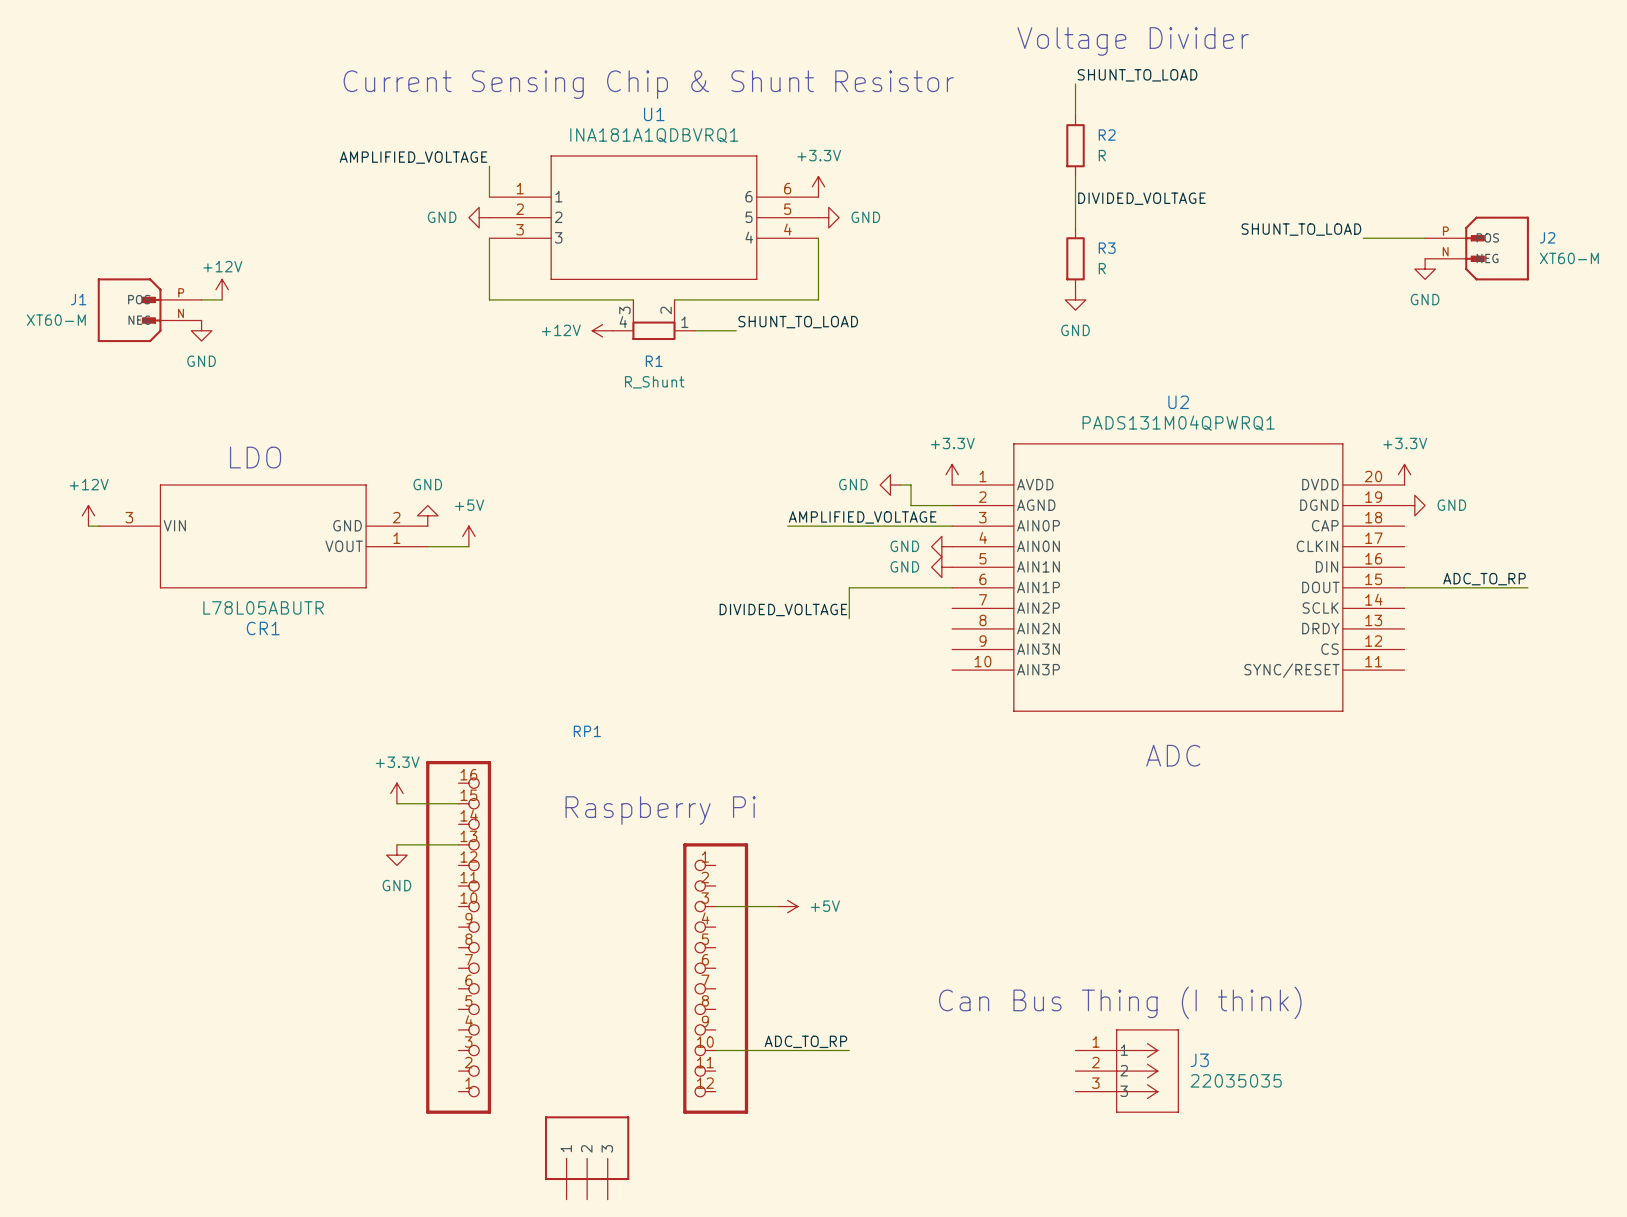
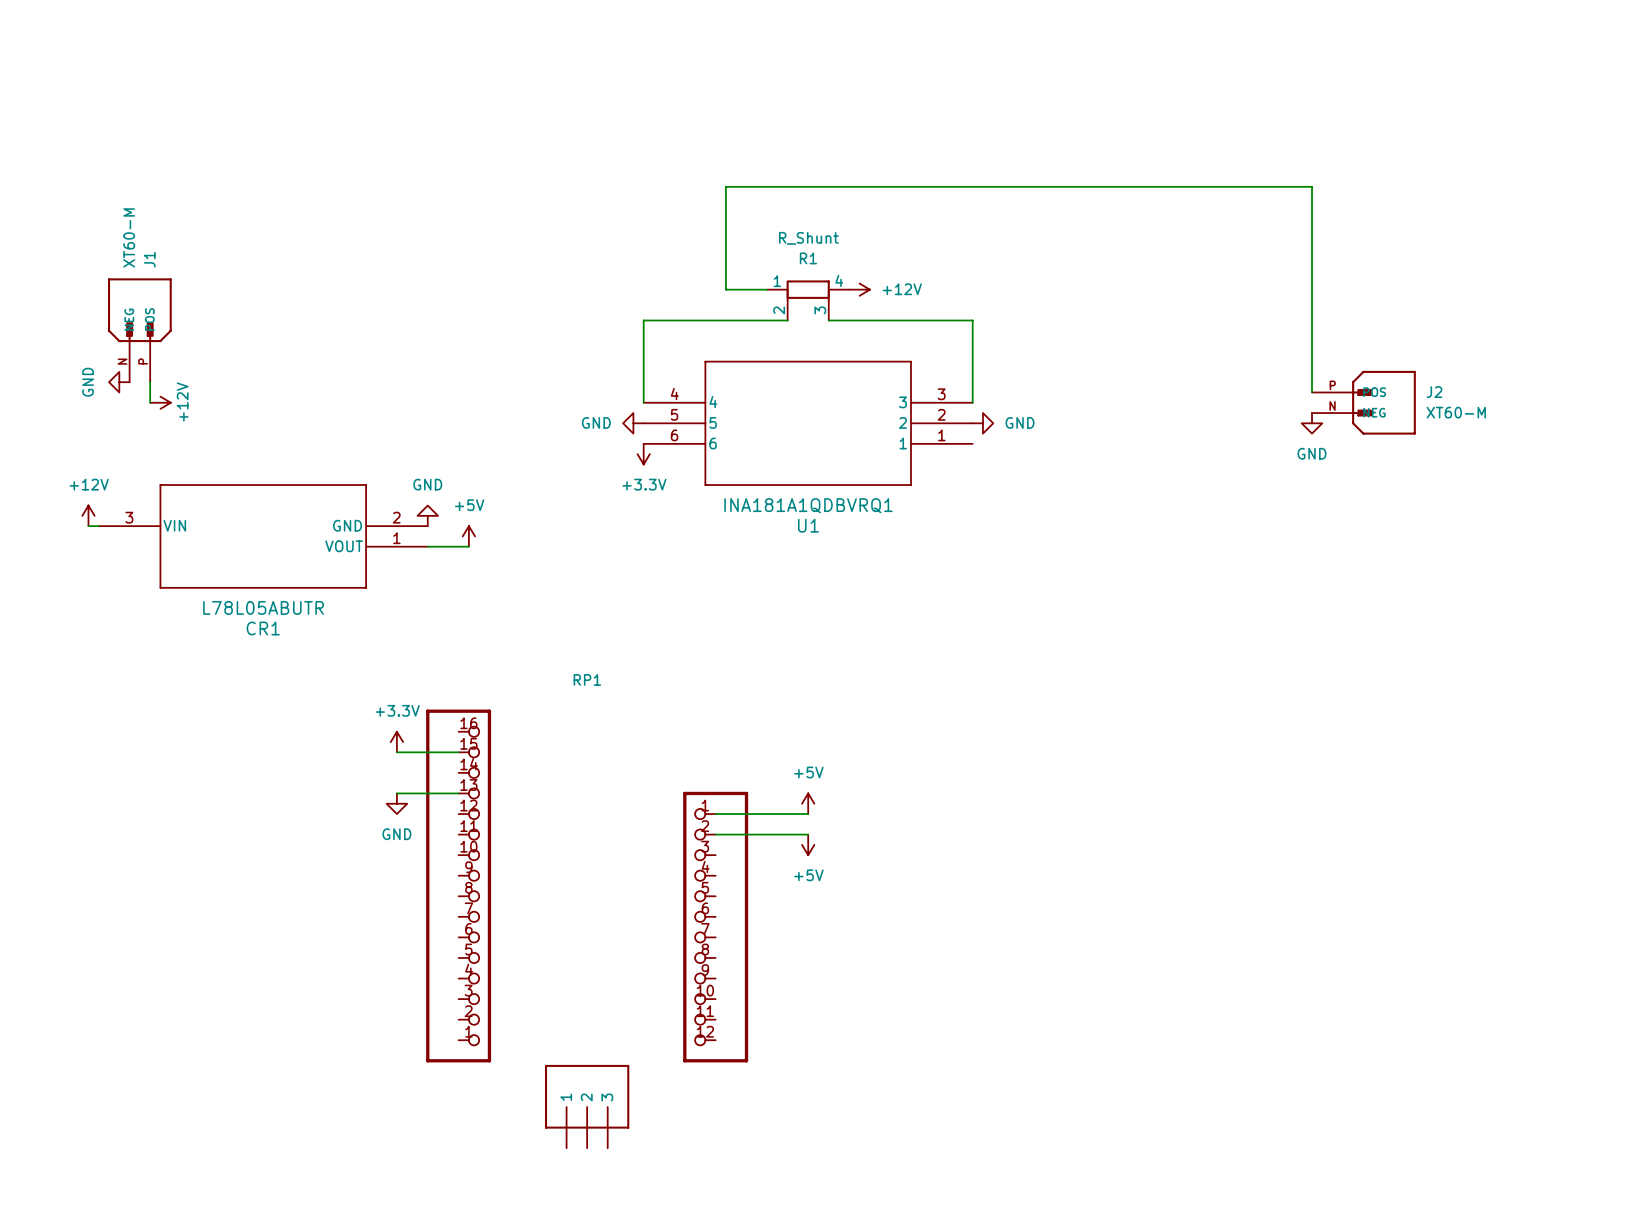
text: Voltage Divider (1133, 41) -> none
label: SHUNT_TO_LOAD (1137, 75) -> none
text: Current Sensing Chip & Shunt Resistor (648, 84) -> none
wire: (1075, 84) (1075, 114) -> none
R2: R (1075, 145) -> none
label: AMPLIFIED_VOLTAGE (413, 157) -> none
wire: (489, 166) (489, 197) -> none
wire: (1075, 176) (1075, 227) -> none
power symbol: +3.3V (818, 186) -> none
label: DIVIDED_VOLTAGE (1141, 198) -> none
power symbol: GND (479, 217) -> none
U1 rotation: 0° (653, 217) -> 180° (808, 423)
U1 position: (653, 217) -> (808, 423)
power symbol: GND (828, 217) -> none
label: SHUNT_TO_LOAD (1301, 229) -> none
wire: (489, 238) (489, 299) (633, 299) -> none
wire: (818, 238) (818, 299) (674, 299) -> none
wire: (1363, 238) (1425, 238) -> none
J2 position: (1477, 248) -> (1363, 402)
R3: R (1075, 258) -> none
power symbol: GND (1425, 269) -> none
power symbol rotation: 0° (222, 289) -> 90° clockwise (160, 402)
power symbol position: +12V (222, 289) -> +12V (160, 402)
wire: none -> (767, 289) (725, 289) (725, 186) (1312, 186) (1312, 392)
power symbol: none -> +12V (859, 289)
wire: (201, 299) (222, 299) -> none
power symbol: GND (1075, 299) -> none
J1 rotation: 0° (129, 310) -> 90° clockwise (139, 310)
R1 position: (653, 319) -> (808, 300)
wire: none -> (787, 320) (643, 320) (643, 402)
wire: none -> (828, 320) (972, 320) (972, 402)
label: SHUNT_TO_LOAD (798, 322) -> none
power symbol rotation: 0° (201, 330) -> 90° clockwise (119, 382)
power symbol position: GND (201, 330) -> GND (119, 382)
power symbol: +12V (602, 330) -> none
R1 rotation: 0° (653, 330) -> 180° (808, 290)
wire: (695, 330) (736, 330) -> none
wire: none -> (150, 382) (150, 402)
power symbol: none -> GND (633, 423)
power symbol: none -> GND (982, 423)
power symbol: none -> GND (1312, 423)
power symbol: none -> +3.3V (643, 454)
text: LDO (255, 457) -> none
power symbol: +3.3V (952, 474) -> none
power symbol: +3.3V (1404, 474) -> none
power symbol: GND (890, 485) -> none
wire: (900, 485) (911, 485) (911, 505) (952, 505) -> none
power symbol: GND (1414, 505) -> none
label: AMPLIFIED_VOLTAGE (862, 517) -> none
wire: (787, 526) (952, 526) -> none
power symbol: GND (941, 546) -> none
power symbol: GND (941, 567) -> none
U2: PADS131M04QPWRQ1 (1178, 577) -> none
label: ADC_TO_RP (1484, 579) -> none
wire: (952, 587) (849, 587) (849, 618) -> none
wire: (1404, 587) (1527, 587) -> none
label: DIVIDED_VOLTAGE (783, 609) -> none
text: ADC (1173, 755) -> none
power symbol position: +3.3V (396, 793) -> +3.3V (396, 742)
wire: (396, 803) (458, 803) -> (396, 752) (458, 752)
power symbol: none -> +5V (808, 803)
text: Raspberry Pi (660, 810) -> none
wire: none -> (715, 814) (808, 814)
wire: none -> (715, 834) (808, 834)
wire: (396, 844) (458, 844) -> (396, 793) (458, 793)
power symbol: none -> +5V (808, 844)
power symbol position: GND (396, 855) -> GND (396, 803)
wire: (715, 906) (777, 906) -> none
power symbol: +5V (787, 906) -> none
RP1 position: (587, 980) -> (587, 928)
text: Can Bus Thing (I think) (1120, 1002) -> none
label: ADC_TO_RP (805, 1041) -> none
wire: (715, 1050) (849, 1050) -> none
J3: 22035035 (1127, 1071) -> none

